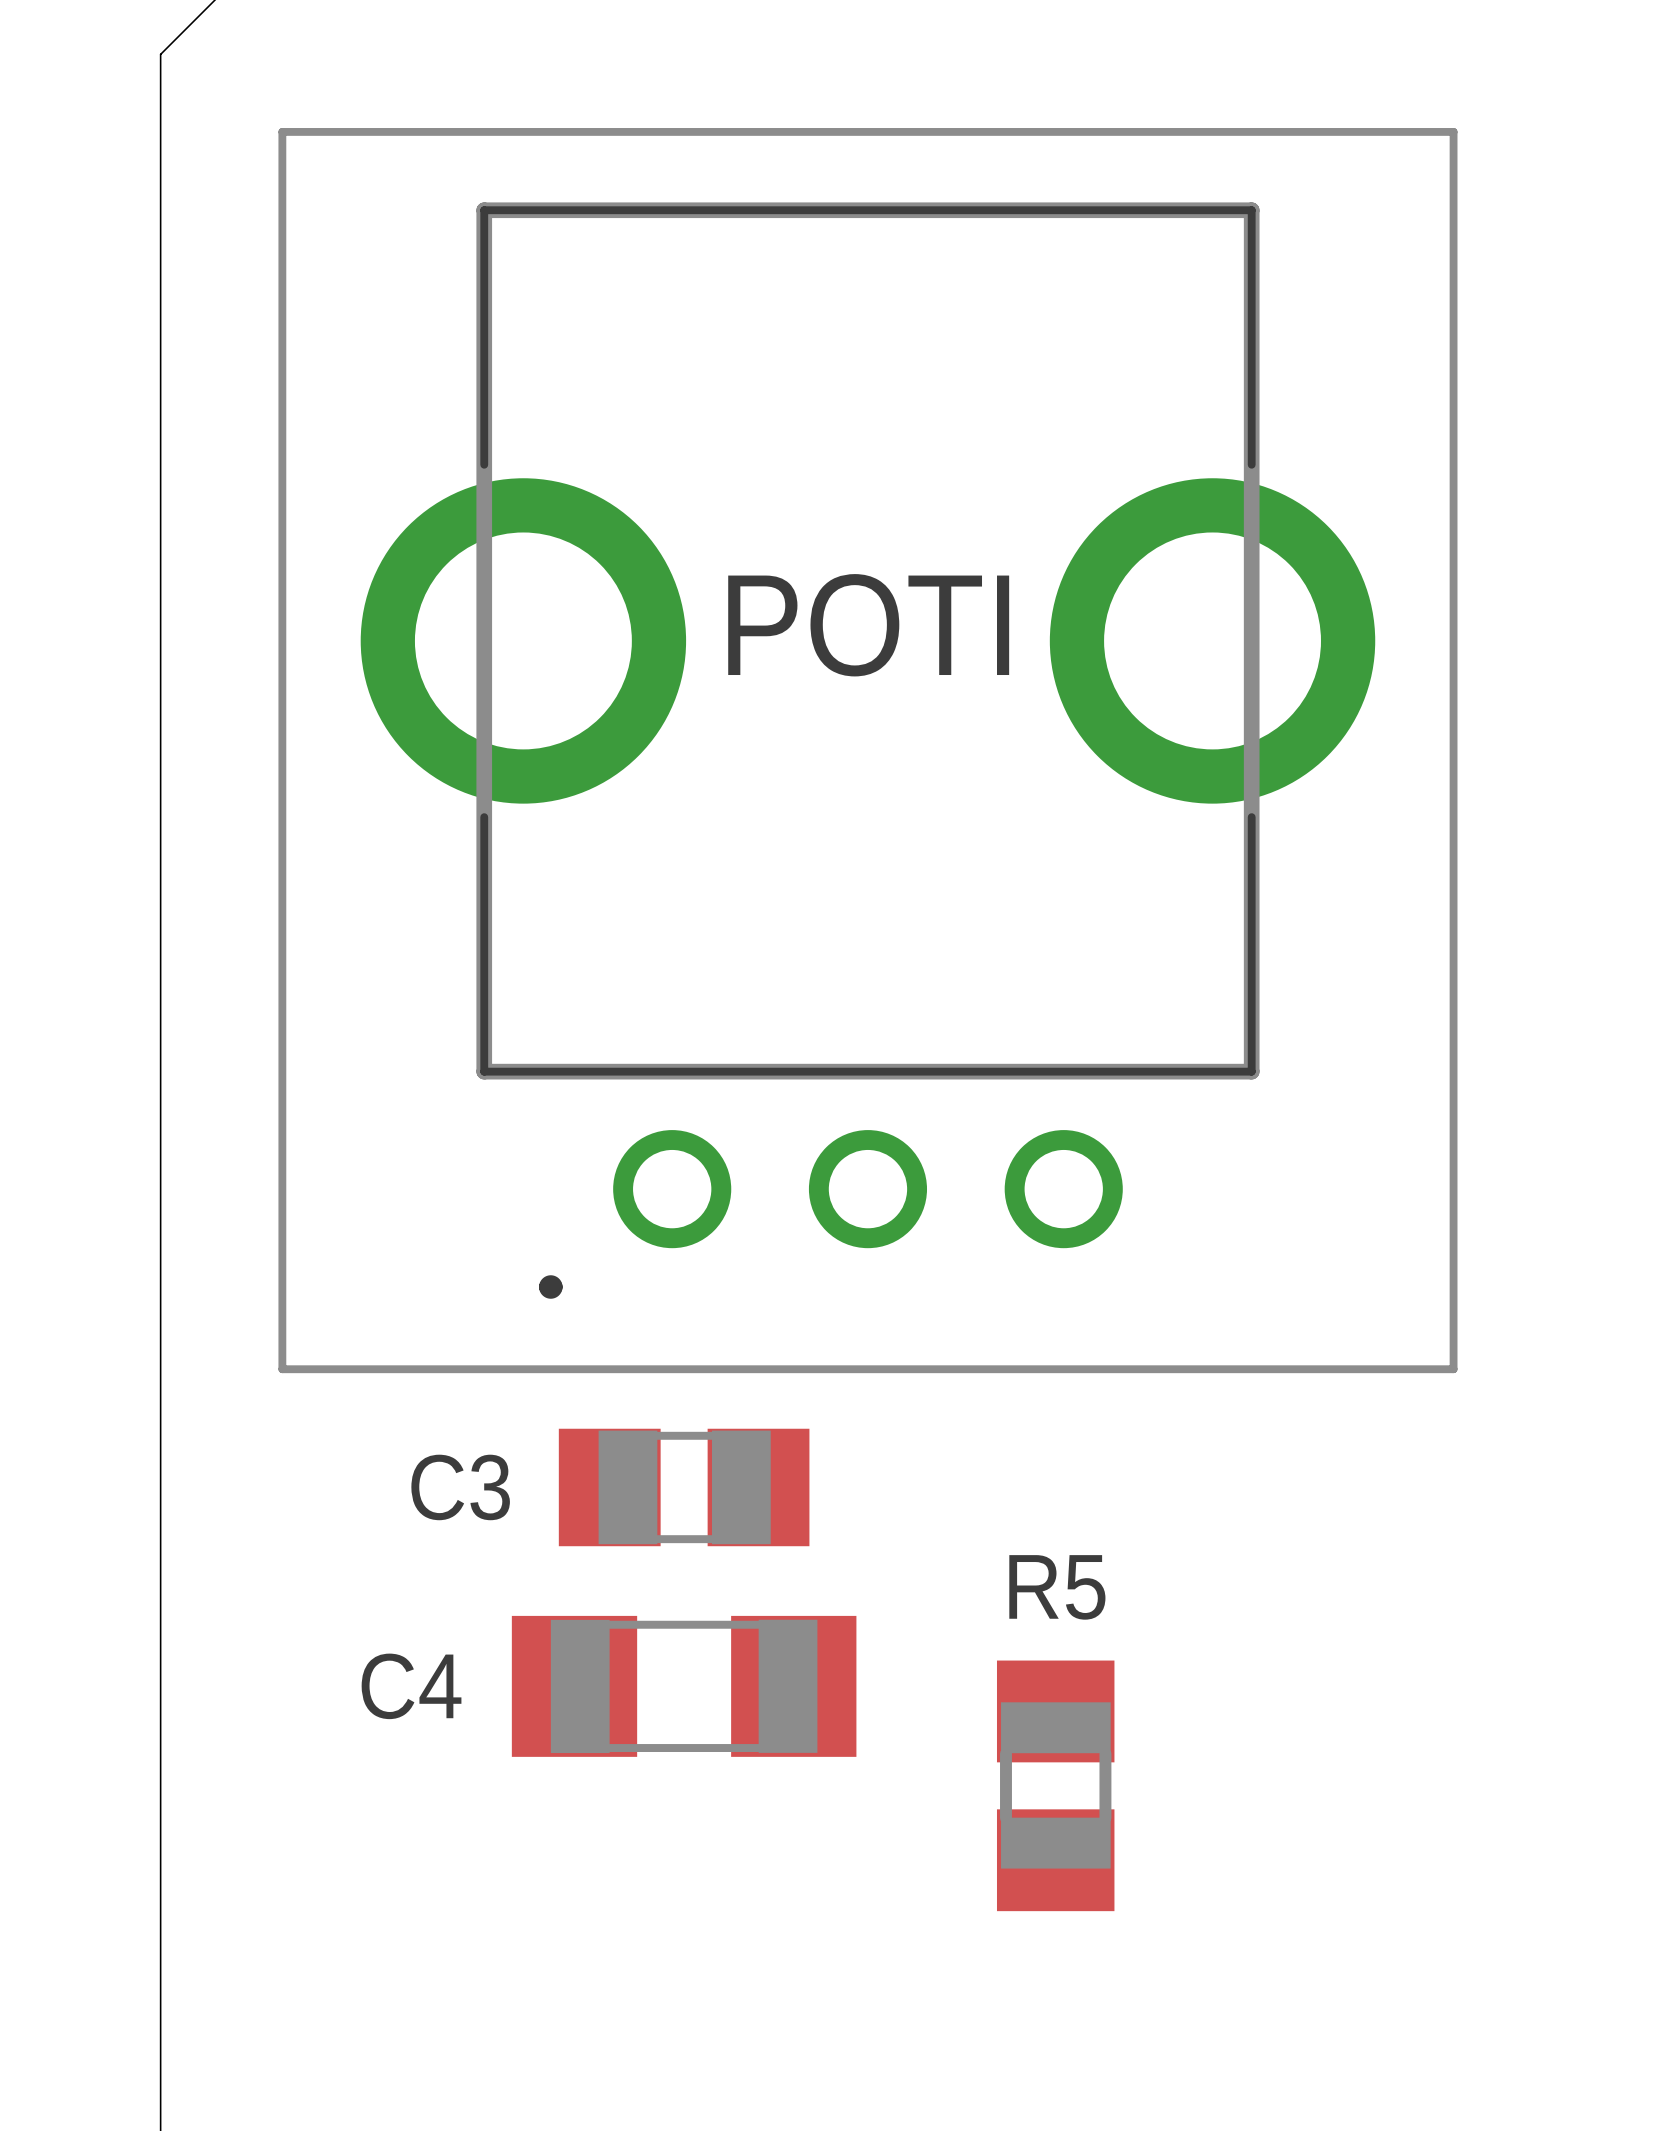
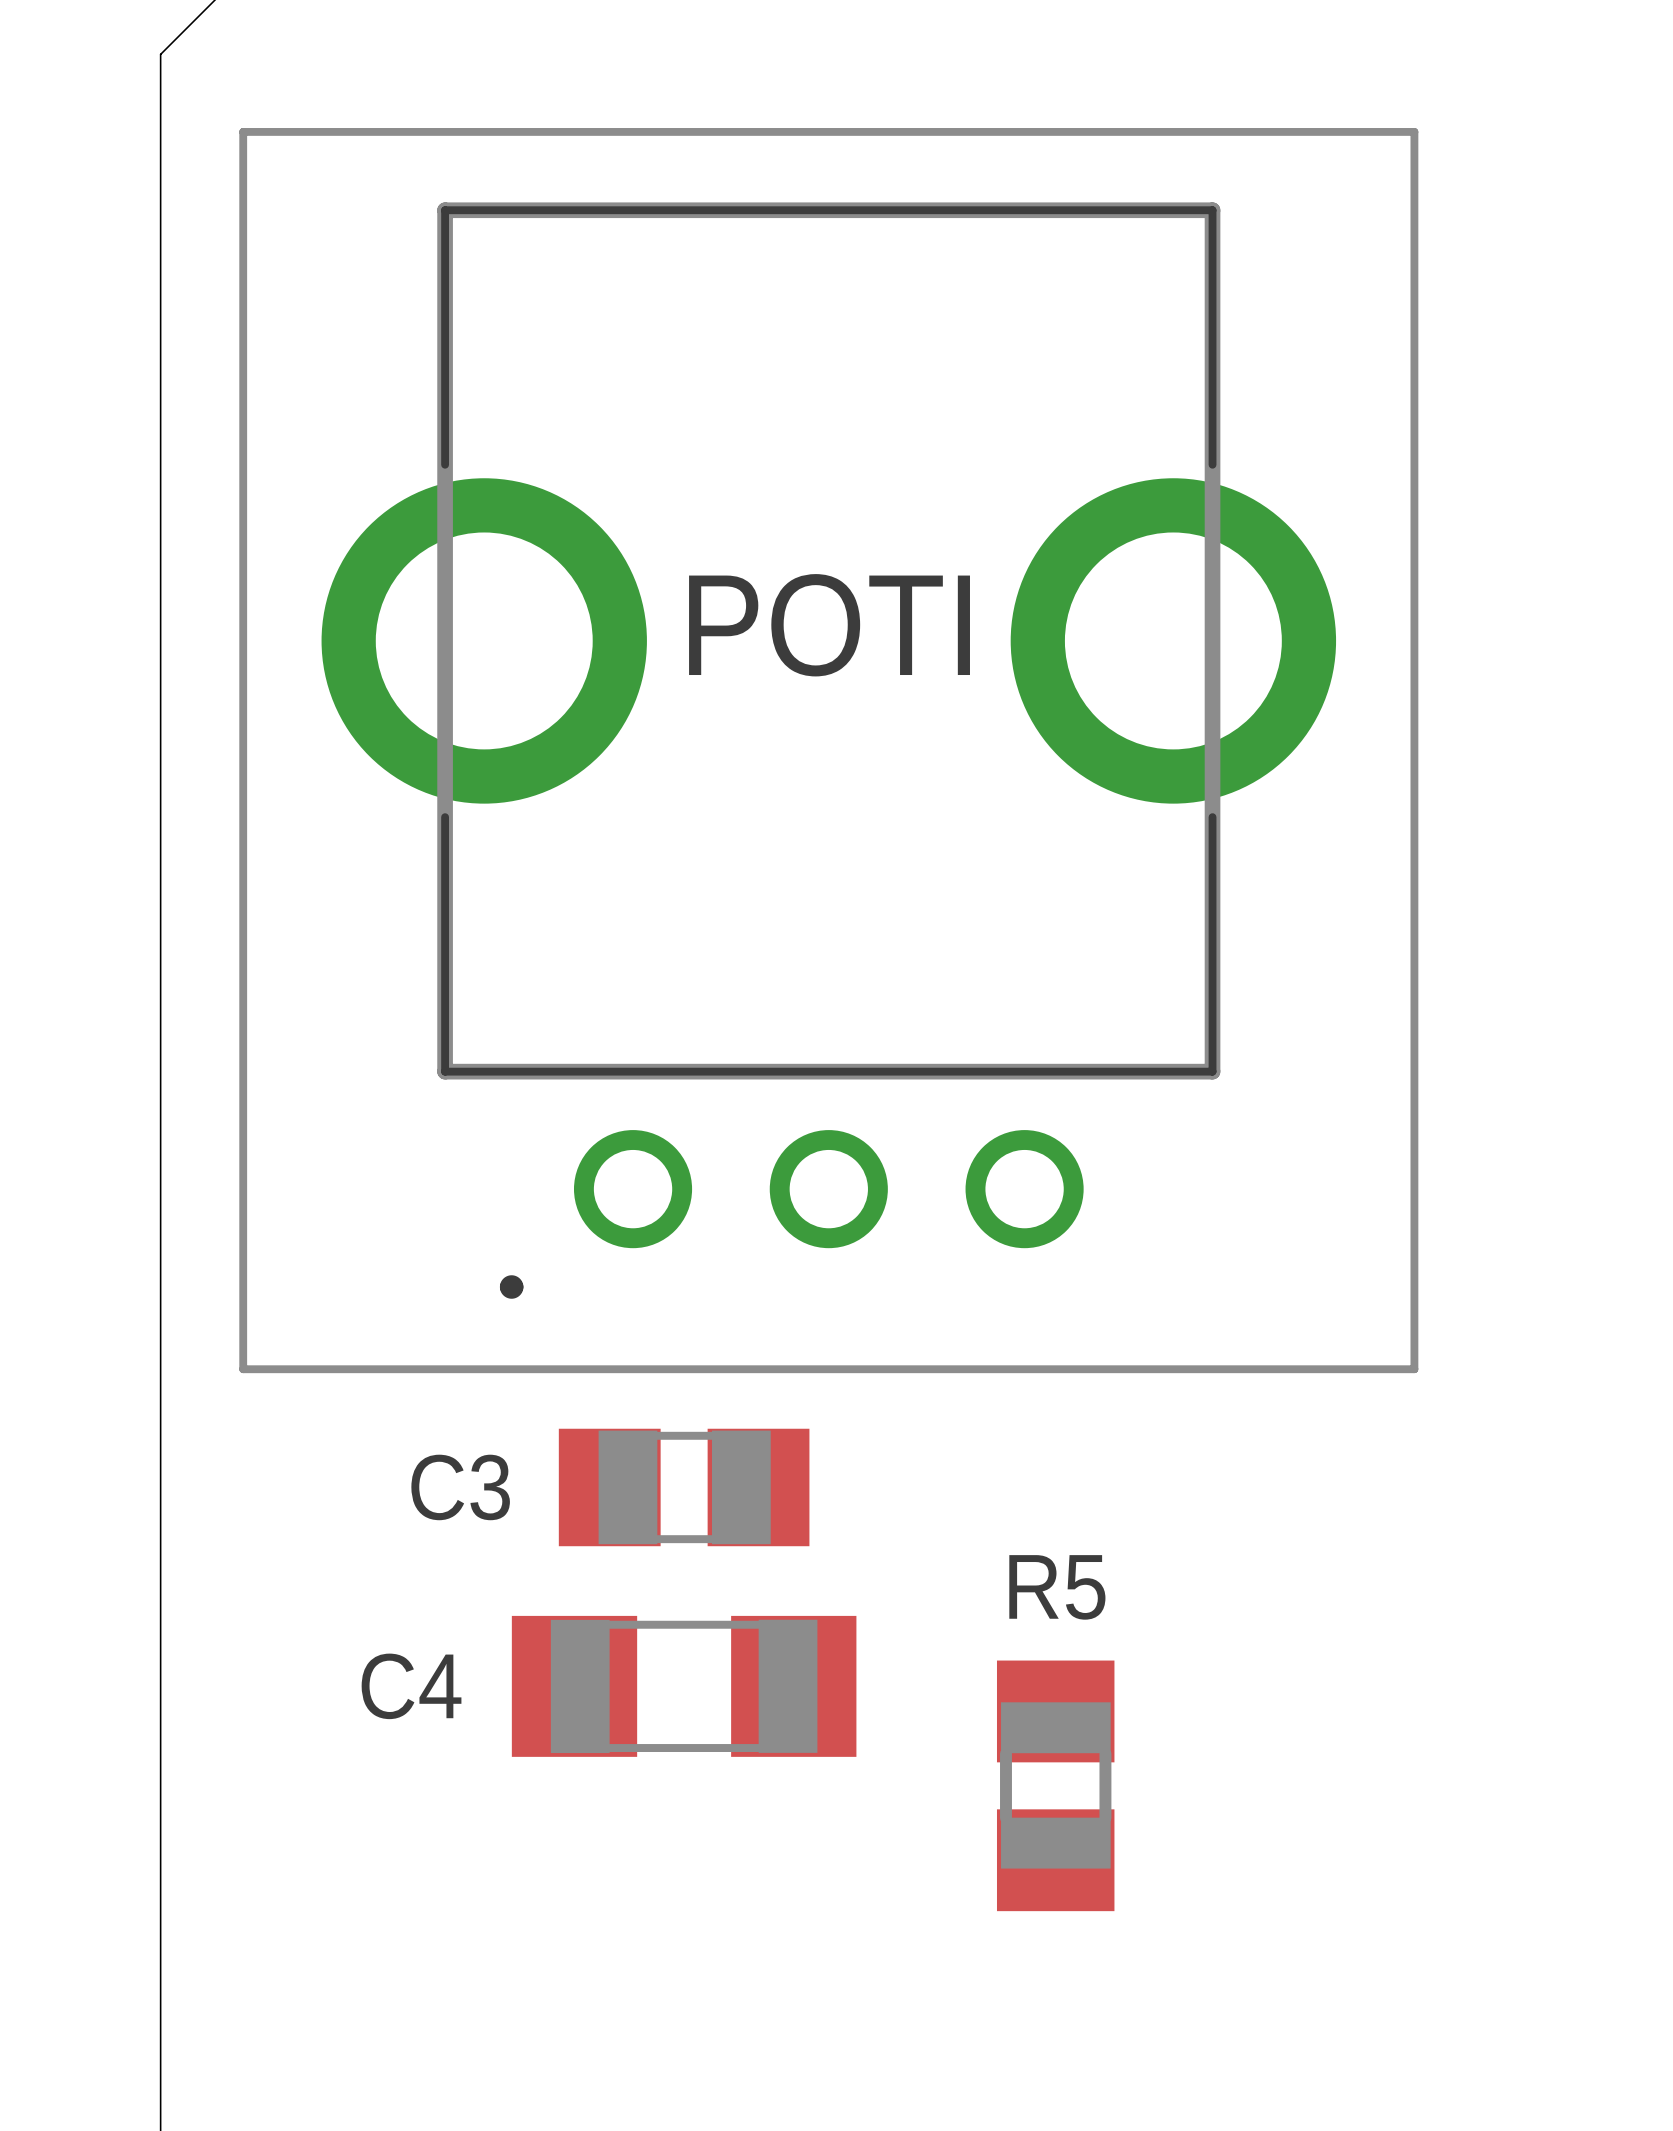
POTI position: (867, 750) -> (828, 750)

